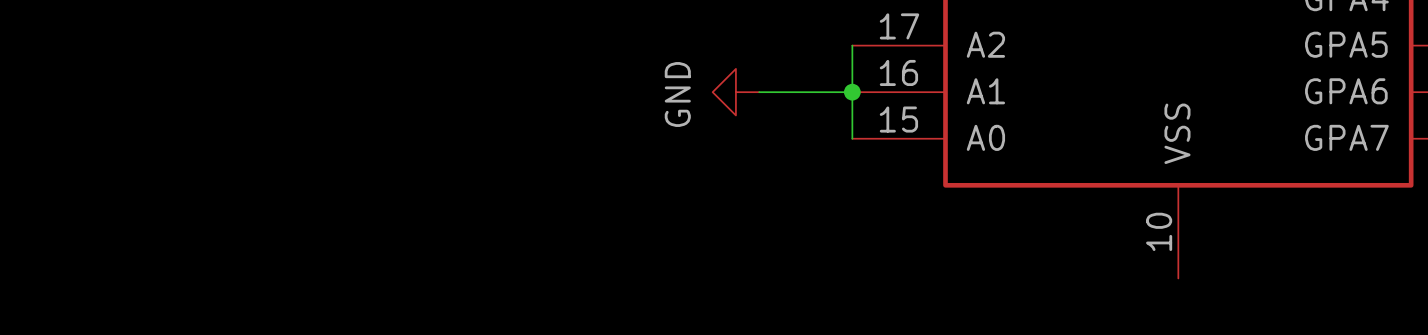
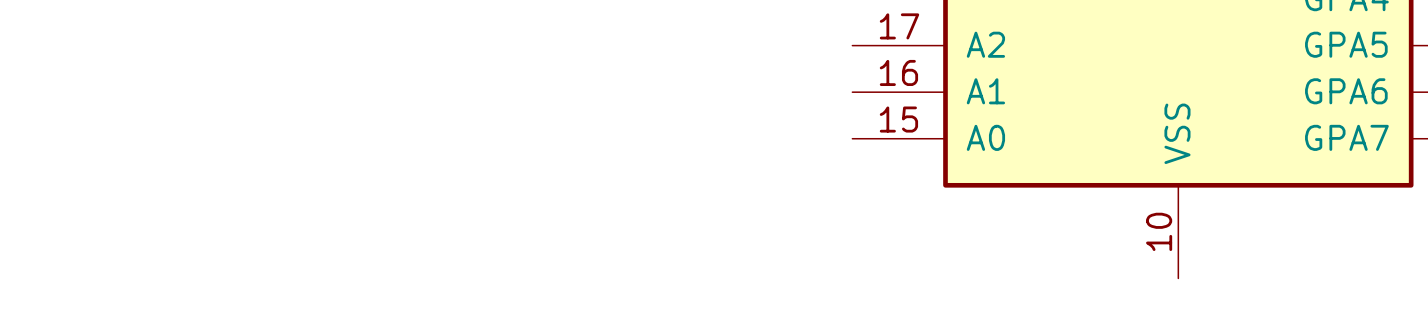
wire: (852, 45) (852, 138) -> none
power symbol: GND (735, 92) -> none
wire: (759, 92) (852, 92) -> none
junction: (852, 92) -> none

